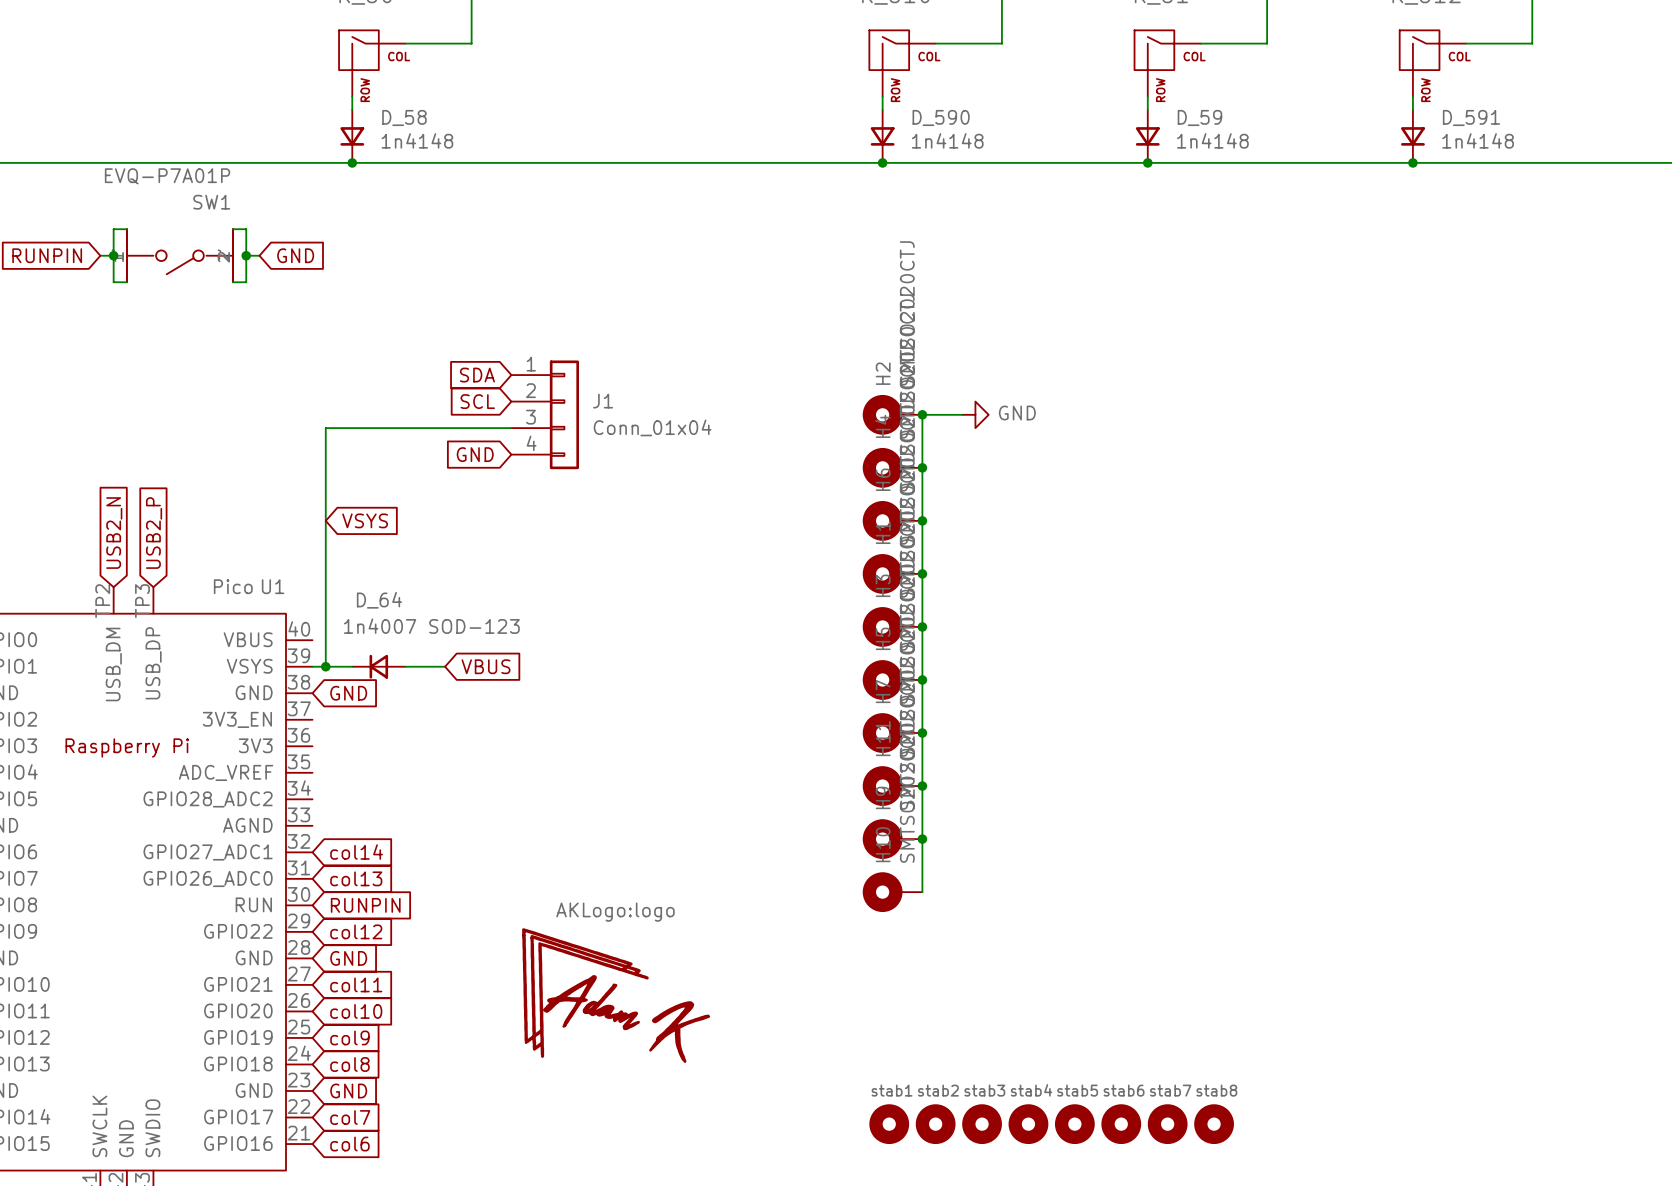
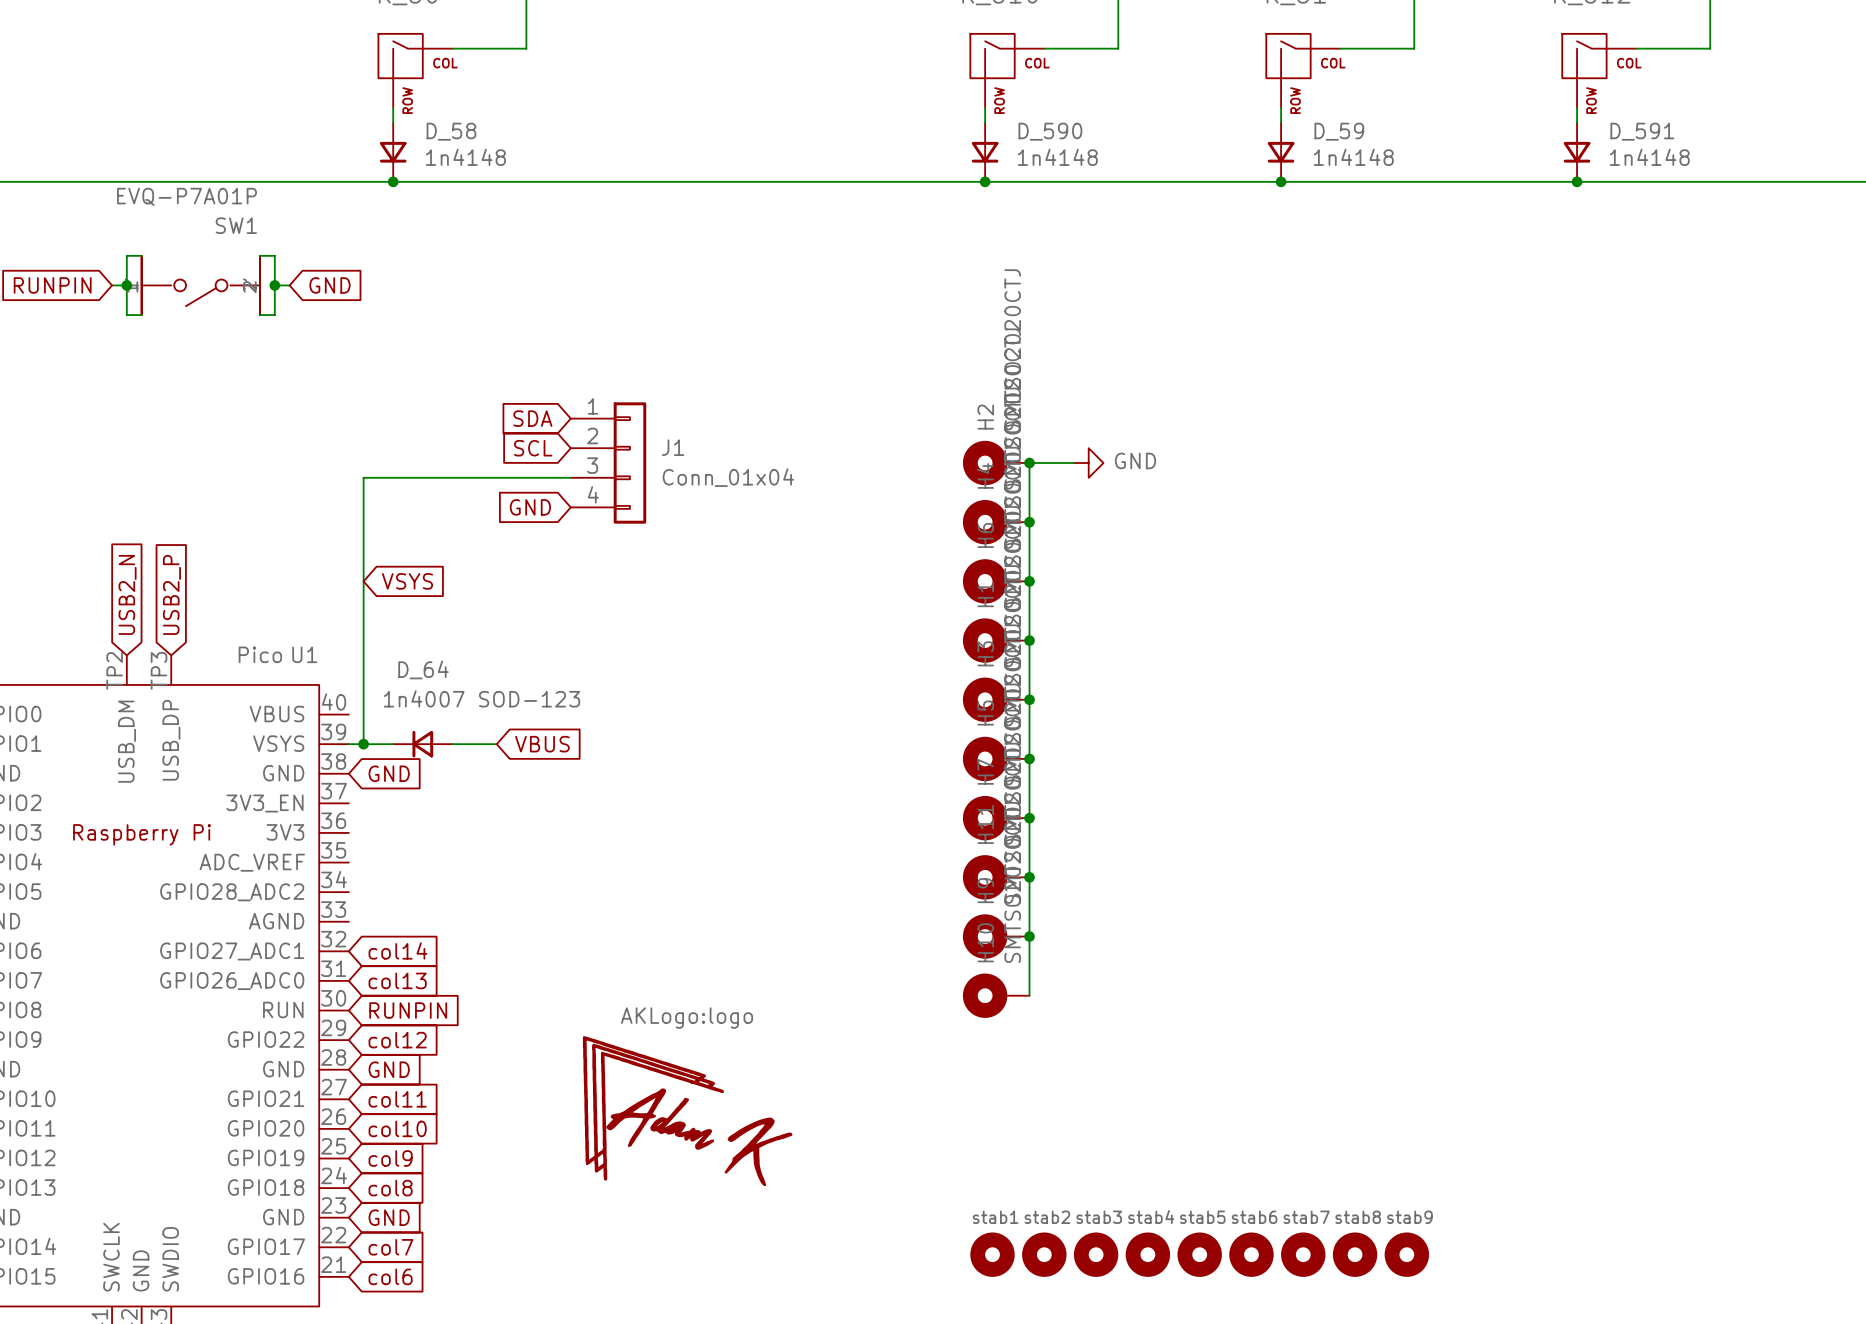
stab9: none -> (1406, 1254)

